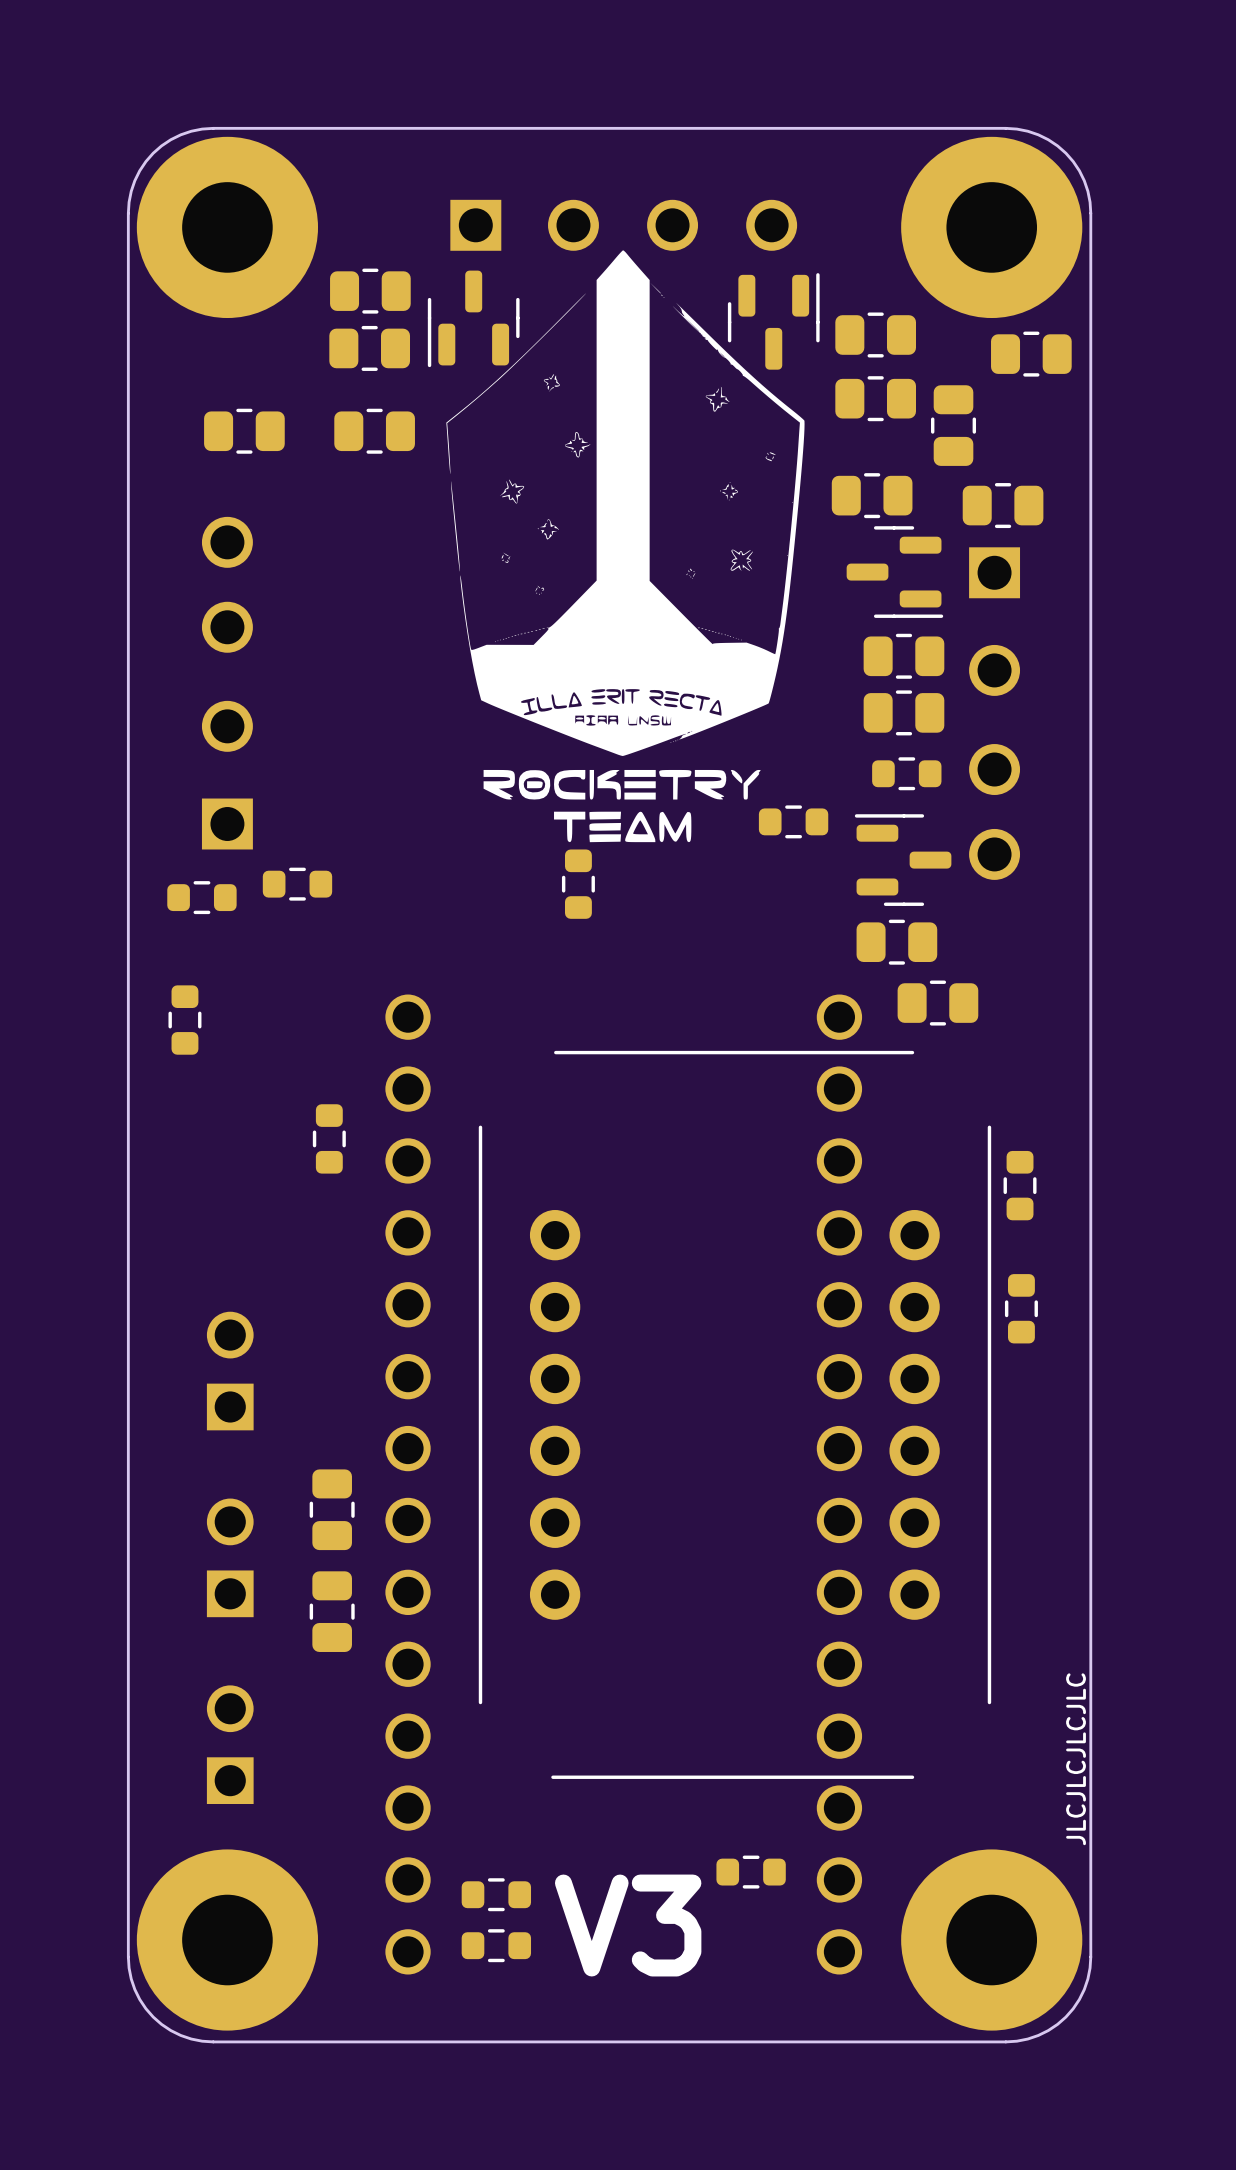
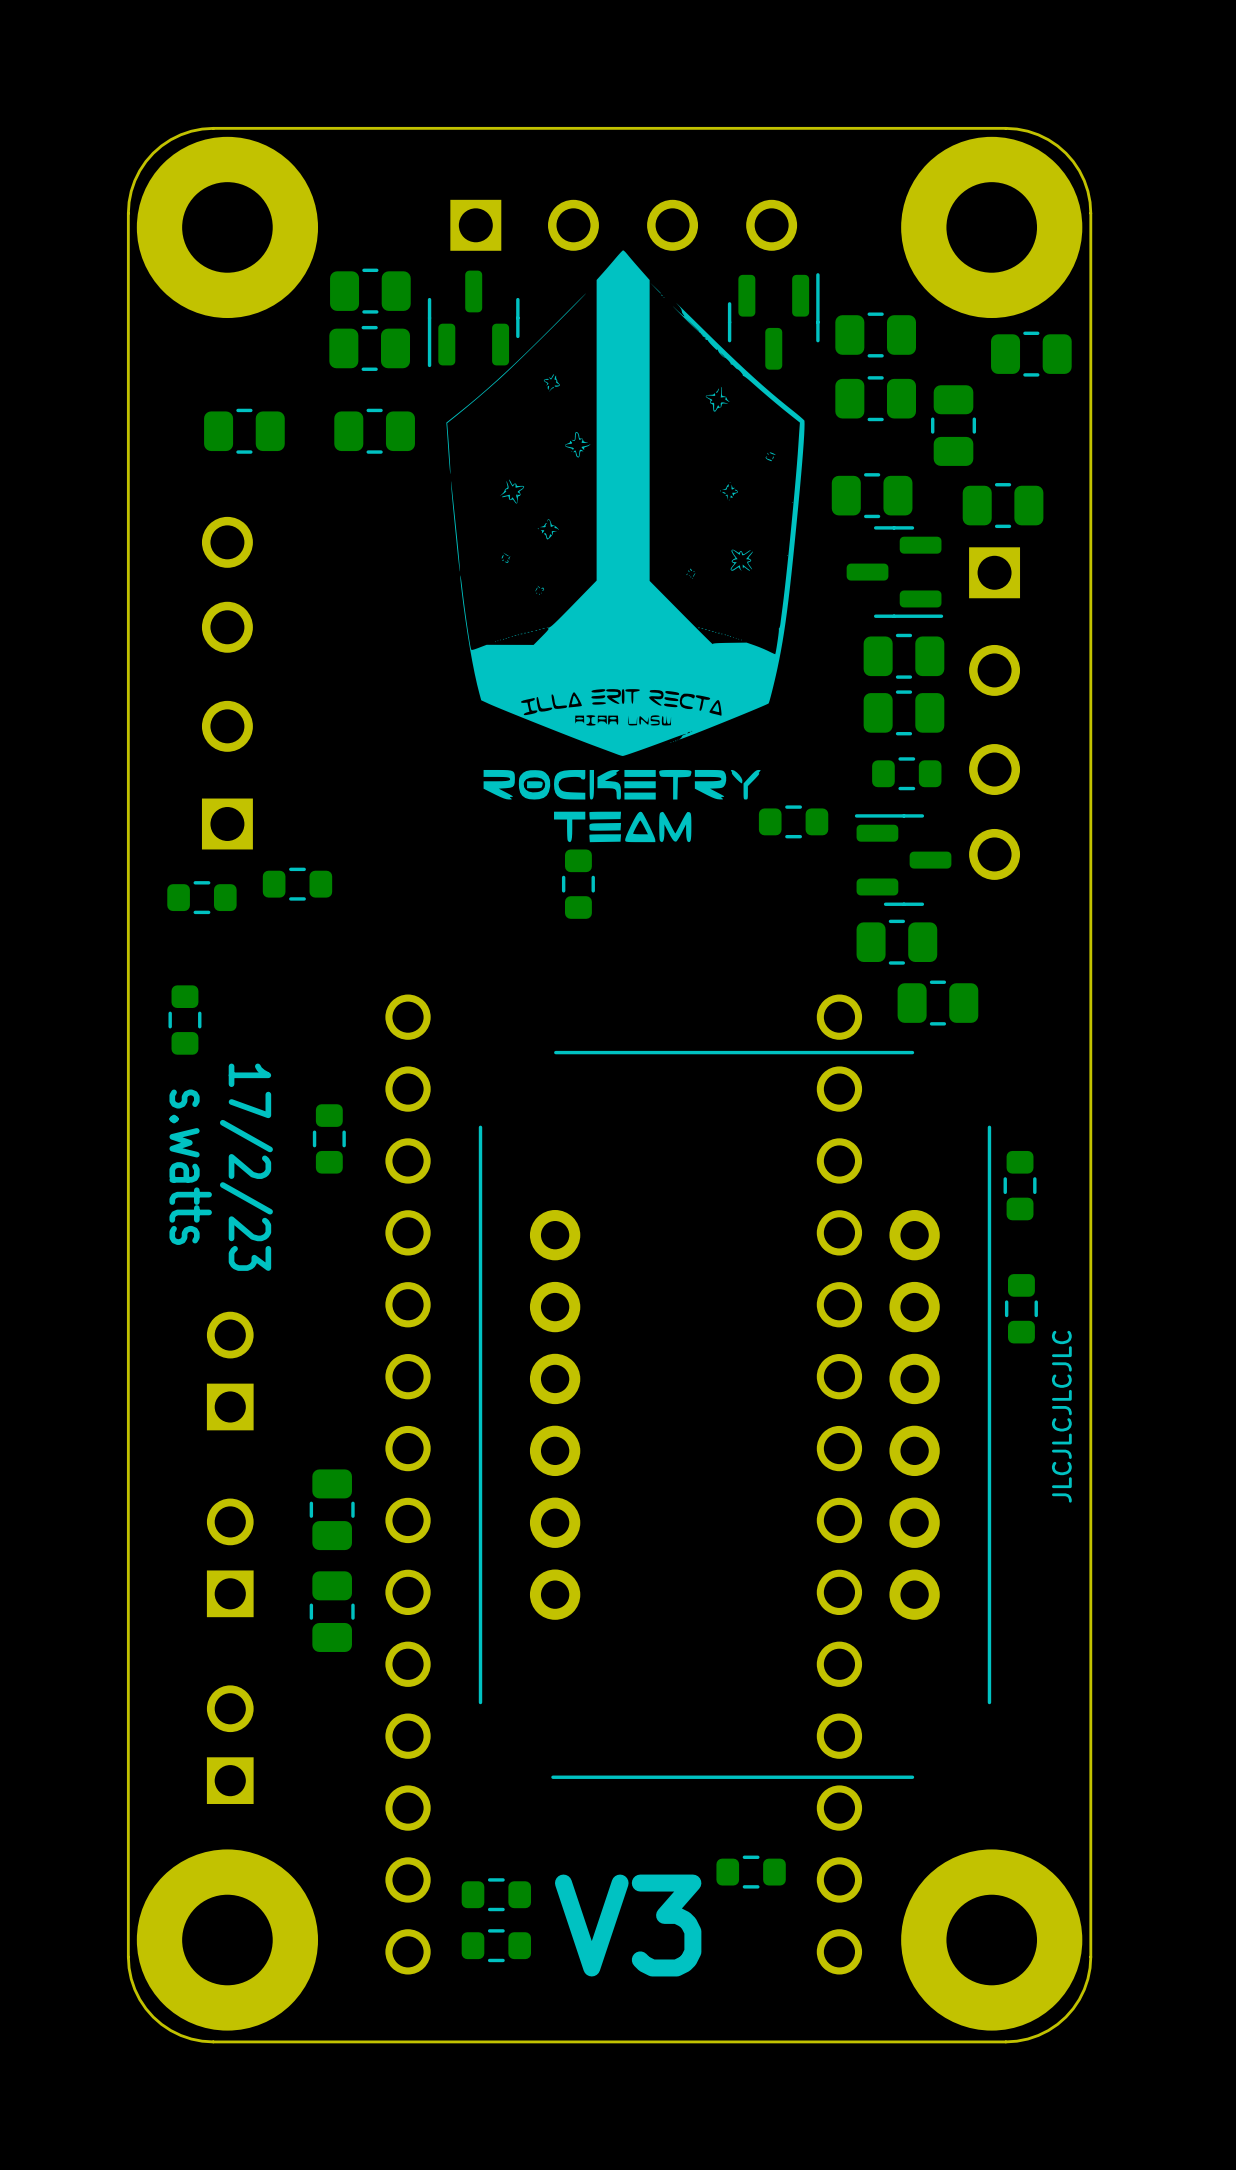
text: none -> s.watts (190, 1167)
text: none -> 17/2/23 (246, 1167)
text position: JLCJLCJLCJLC (1076, 1759) -> JLCJLCJLCJLC (1061, 1416)

